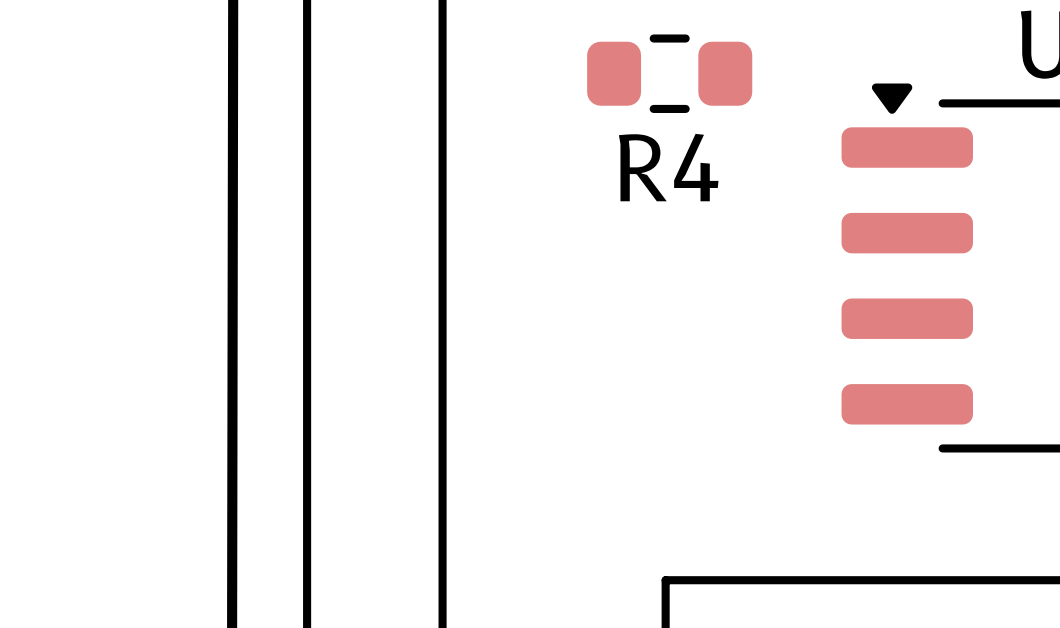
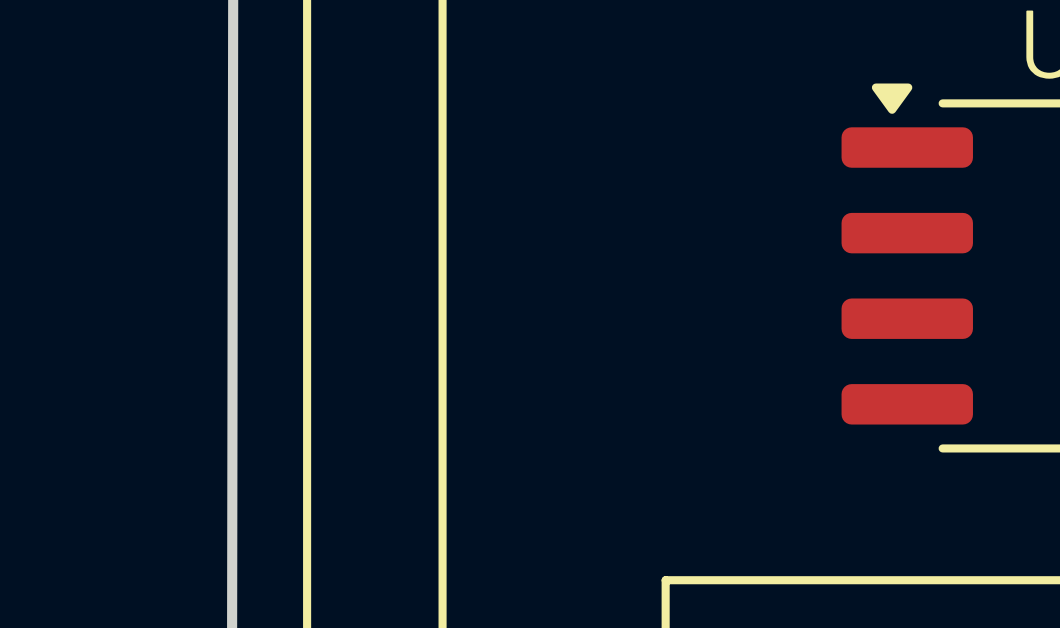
R4: (669, 73) -> none

